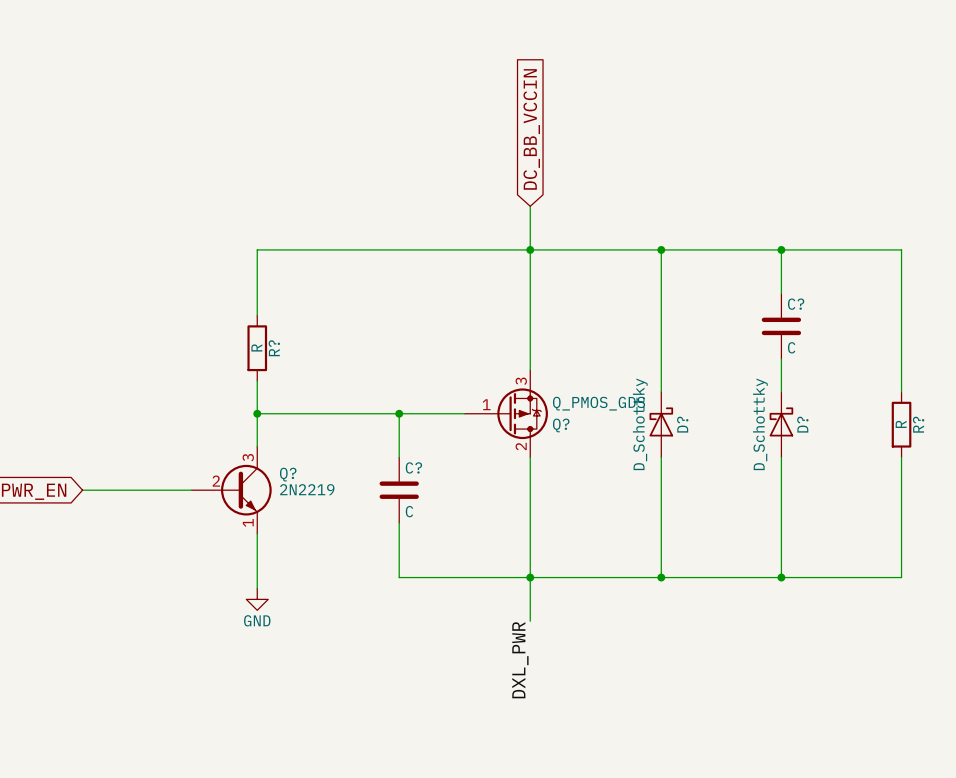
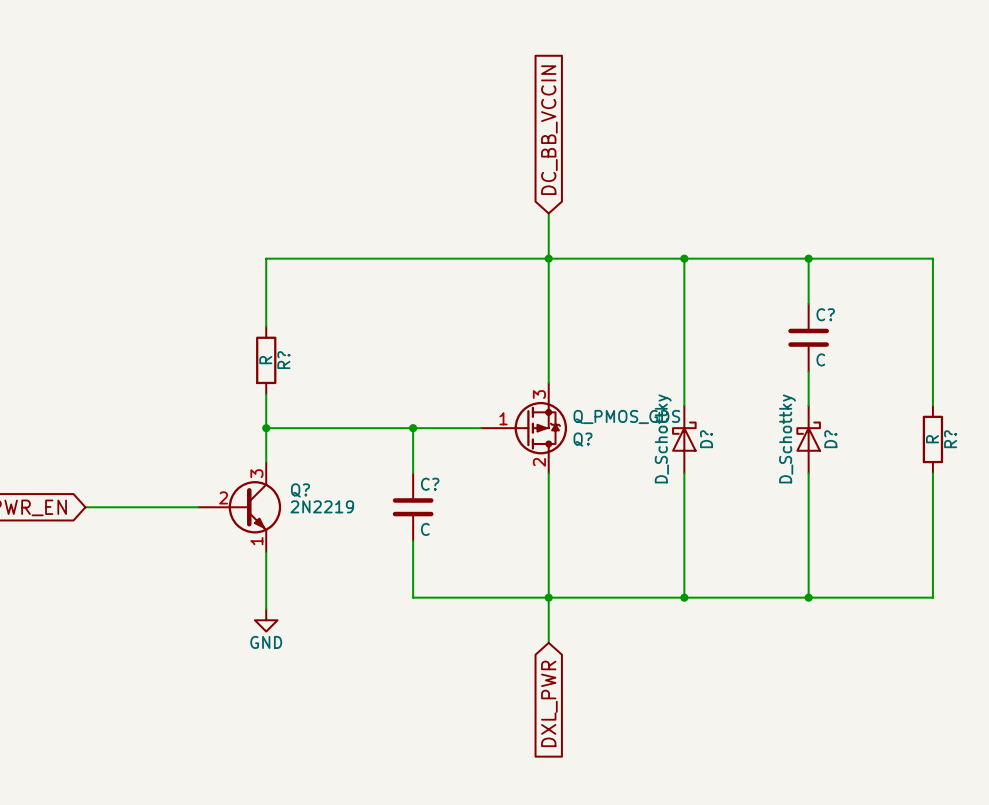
label: DXL_PWR (520, 660) -> none
global label: none -> DXL_PWR (549, 703)

